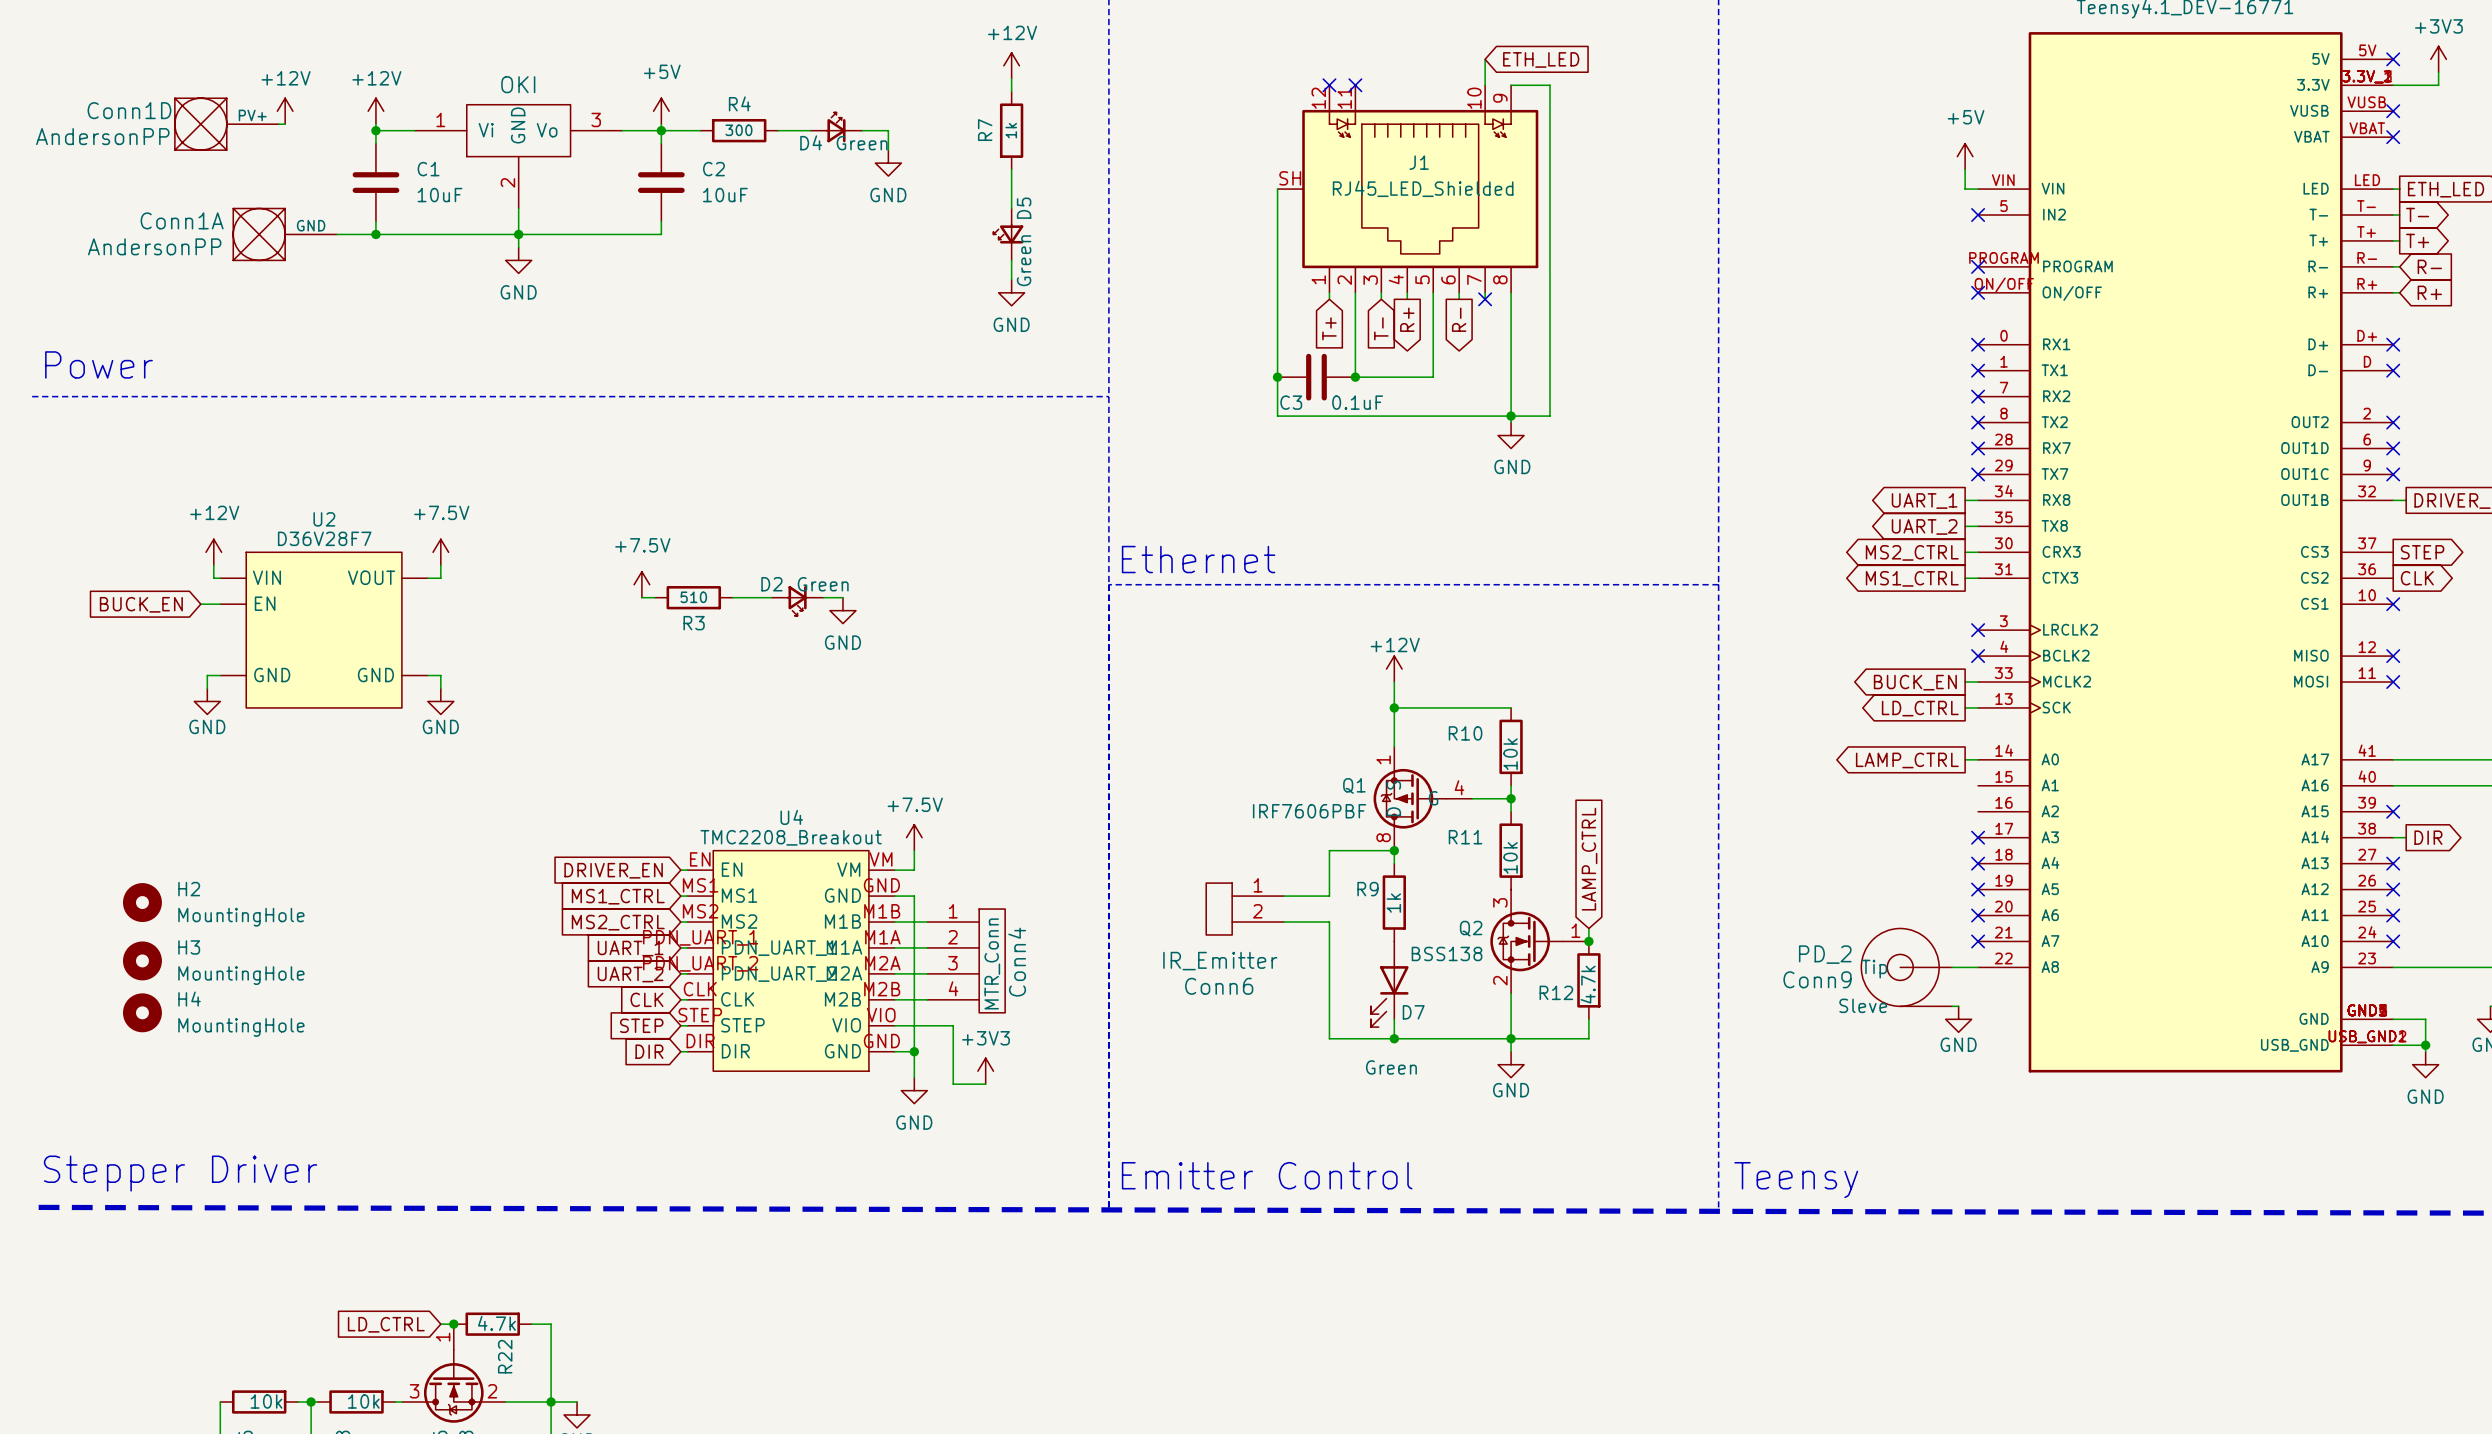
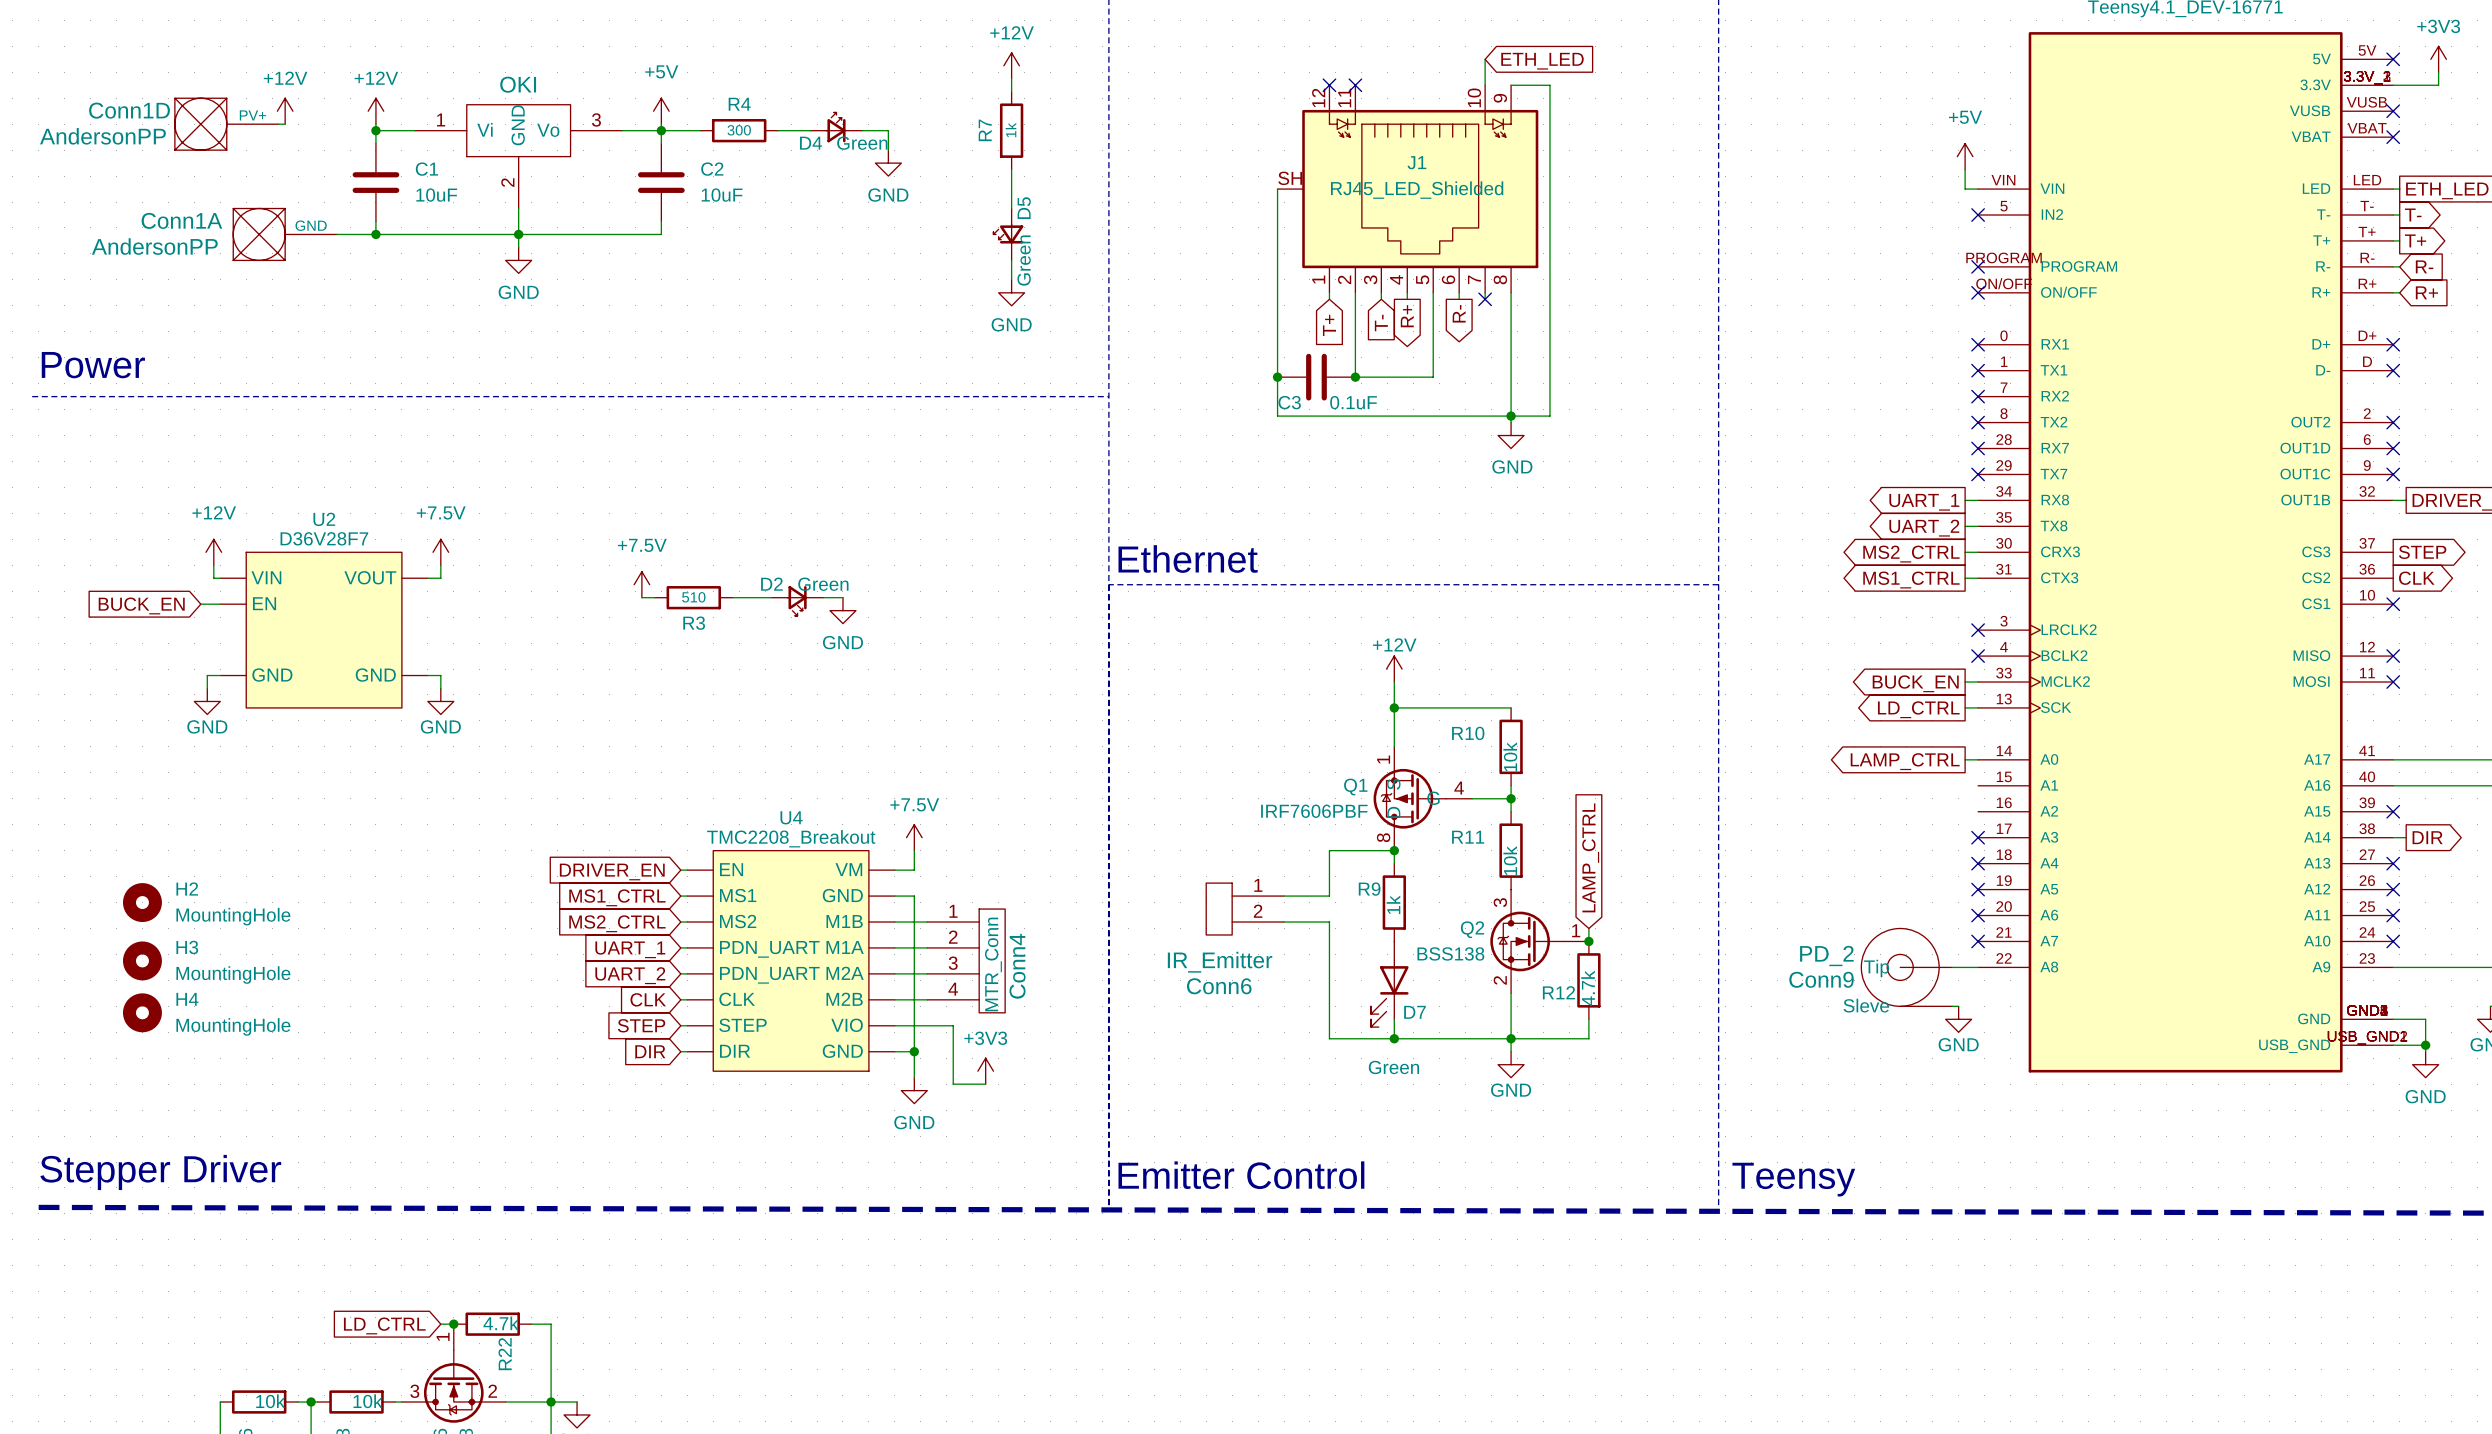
U4 symbol: [687, 850, 895, 1072] -> [687, 850, 895, 1072]

